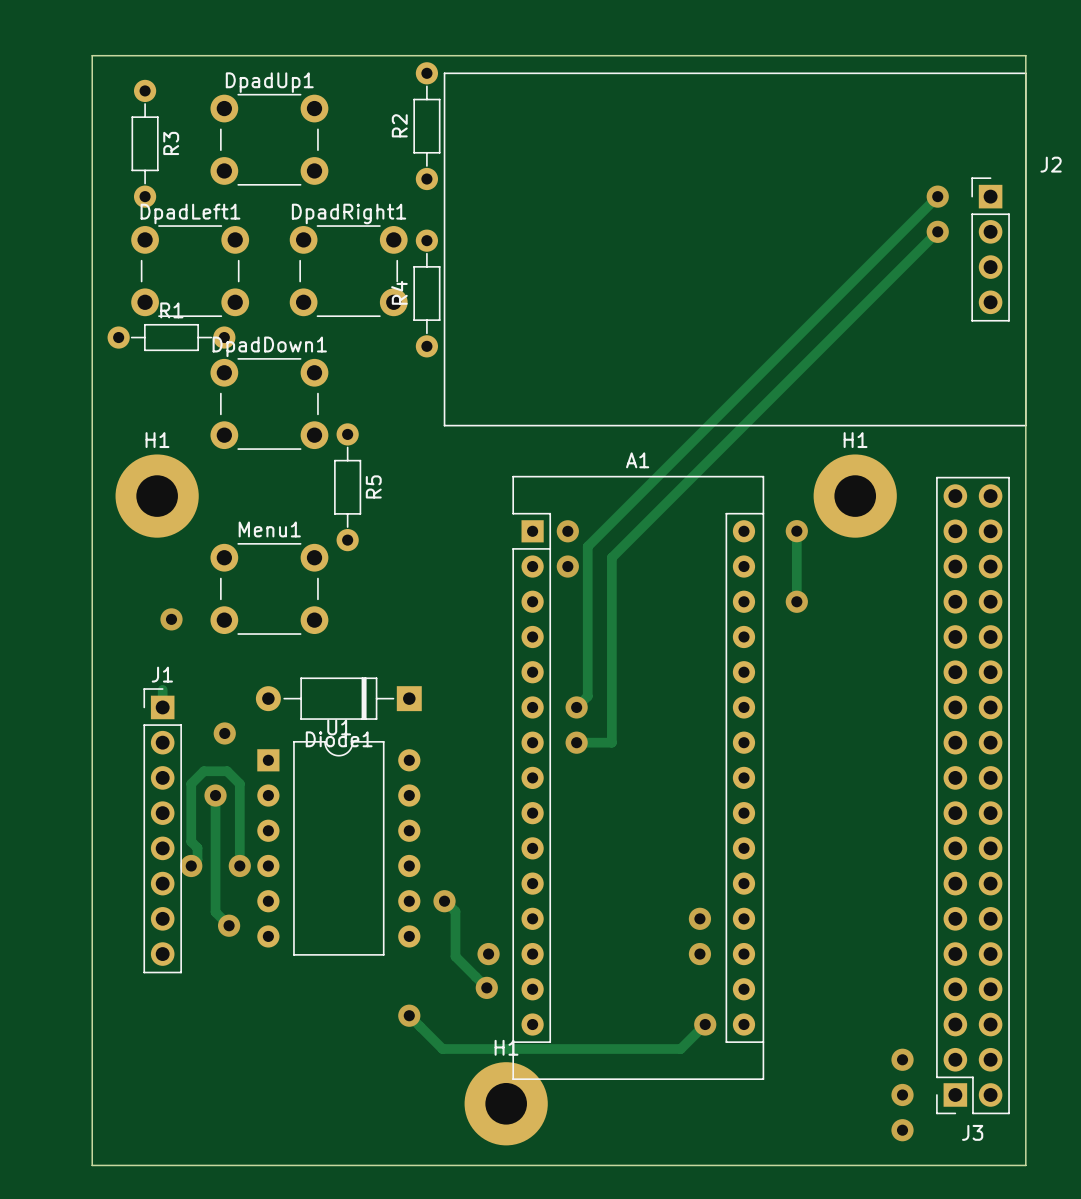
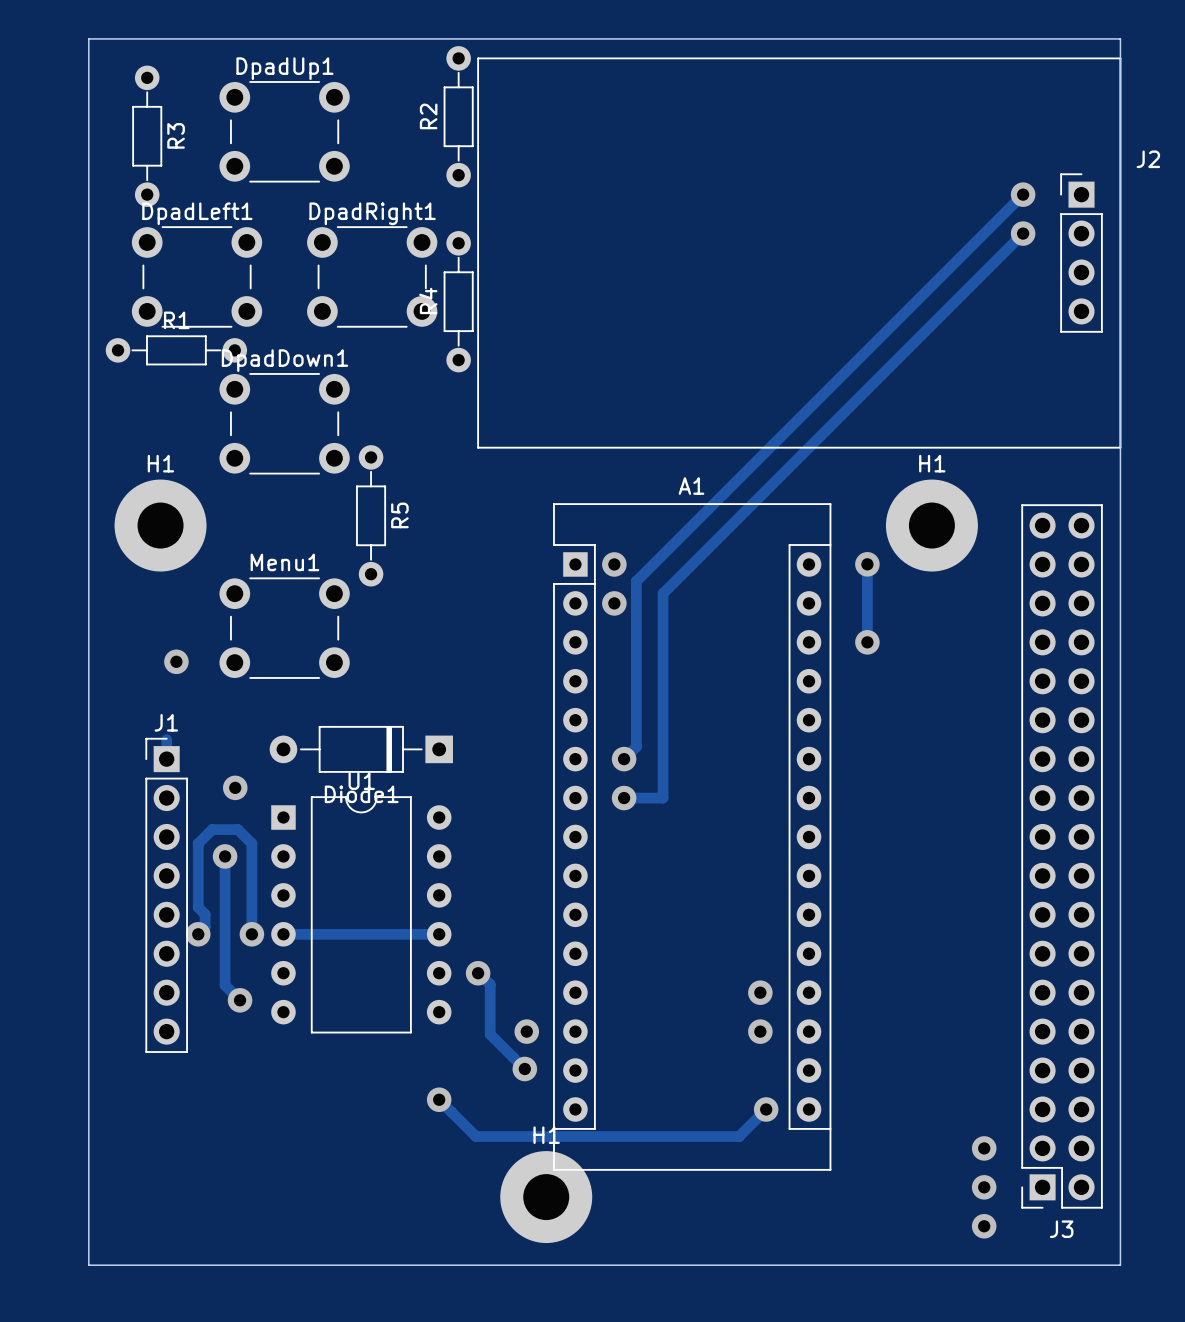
track: none -> (283, 934) (439, 934)

